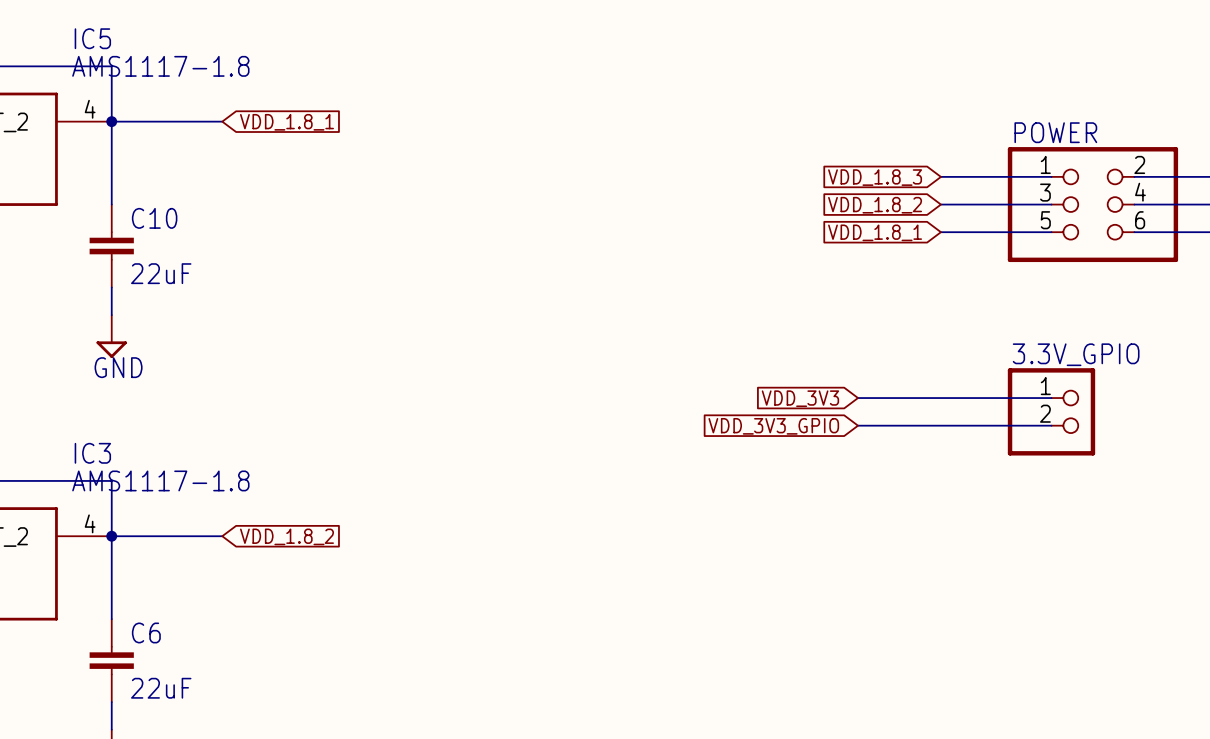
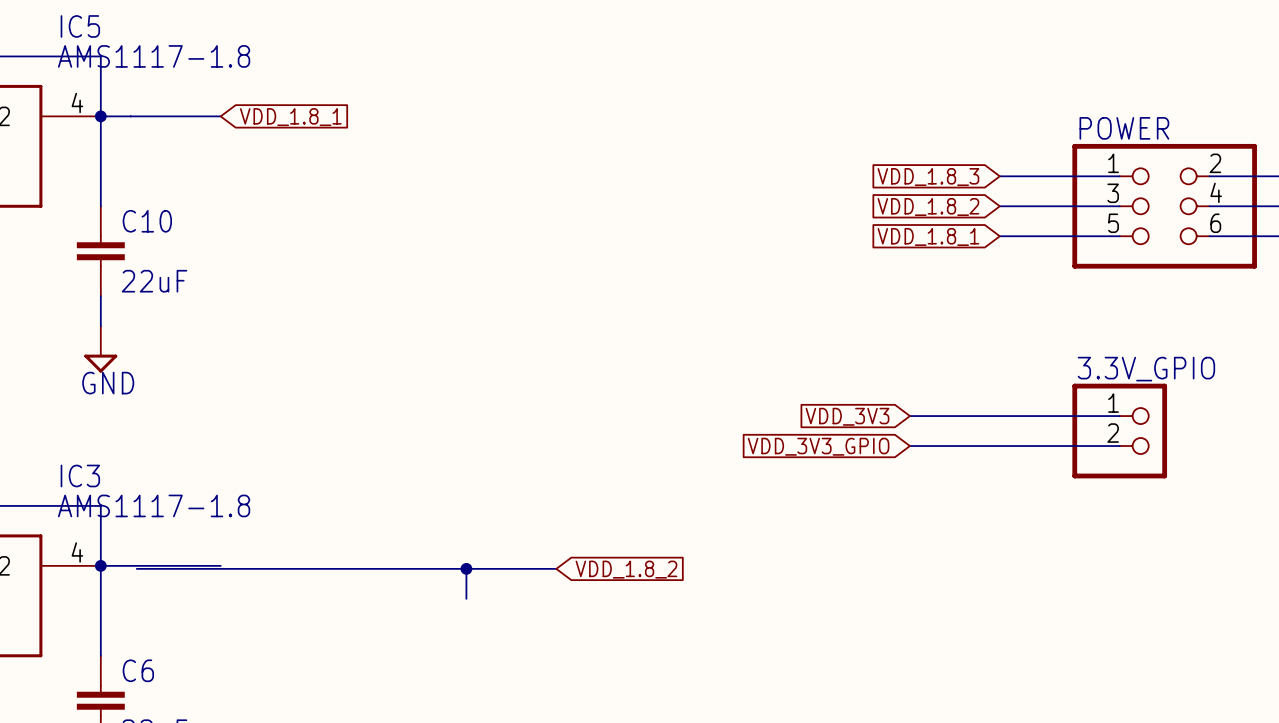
global label: VDD_1.8_2 (286, 536) -> none
wire: none -> (136, 568) (556, 568)
wire: none -> (466, 568) (466, 598)
junction: none -> (466, 568)
global label: none -> VDD_1.8_2 (626, 569)

